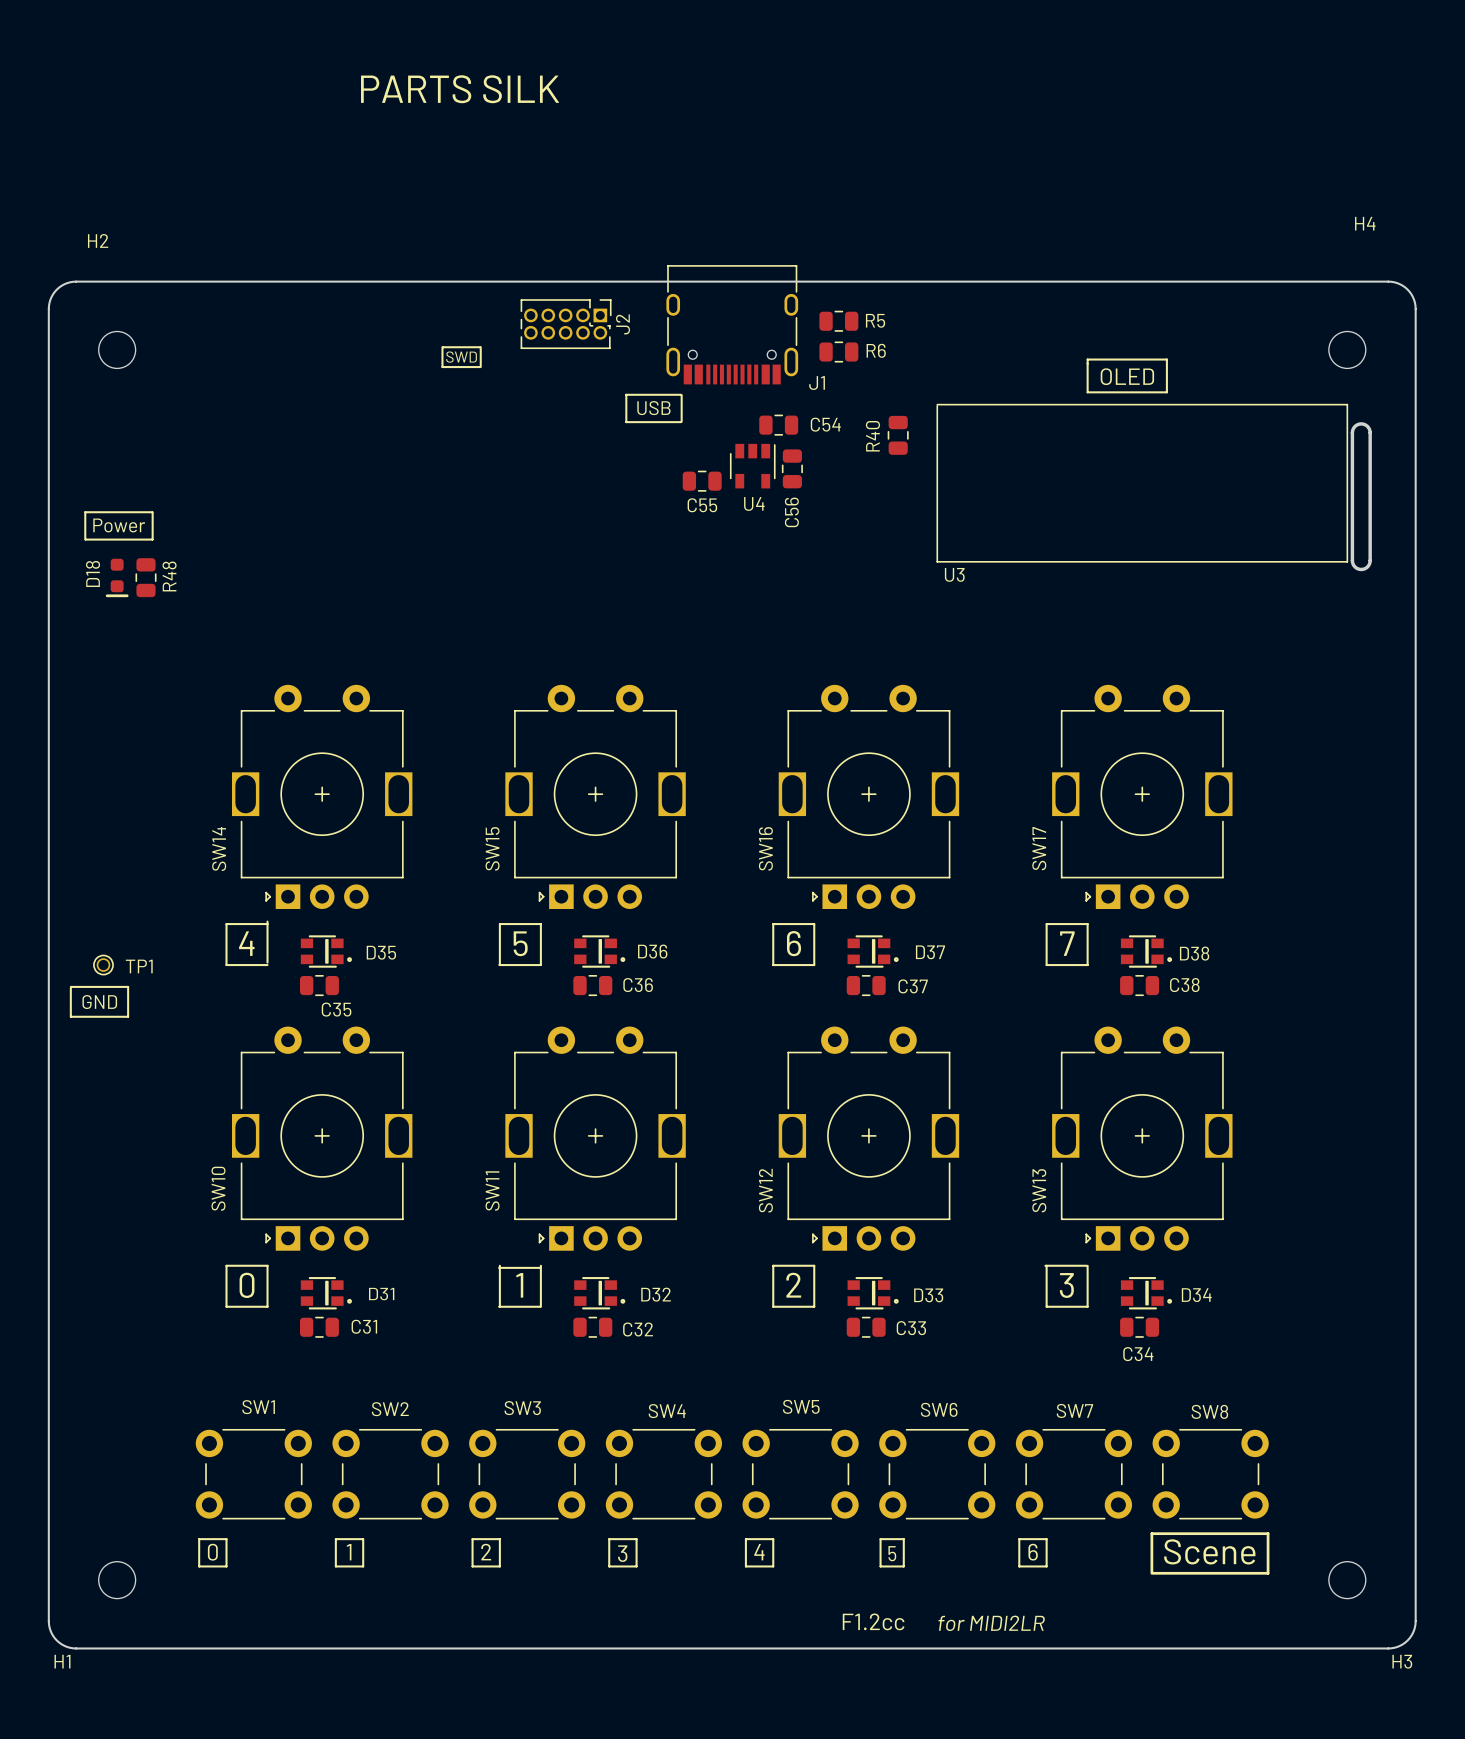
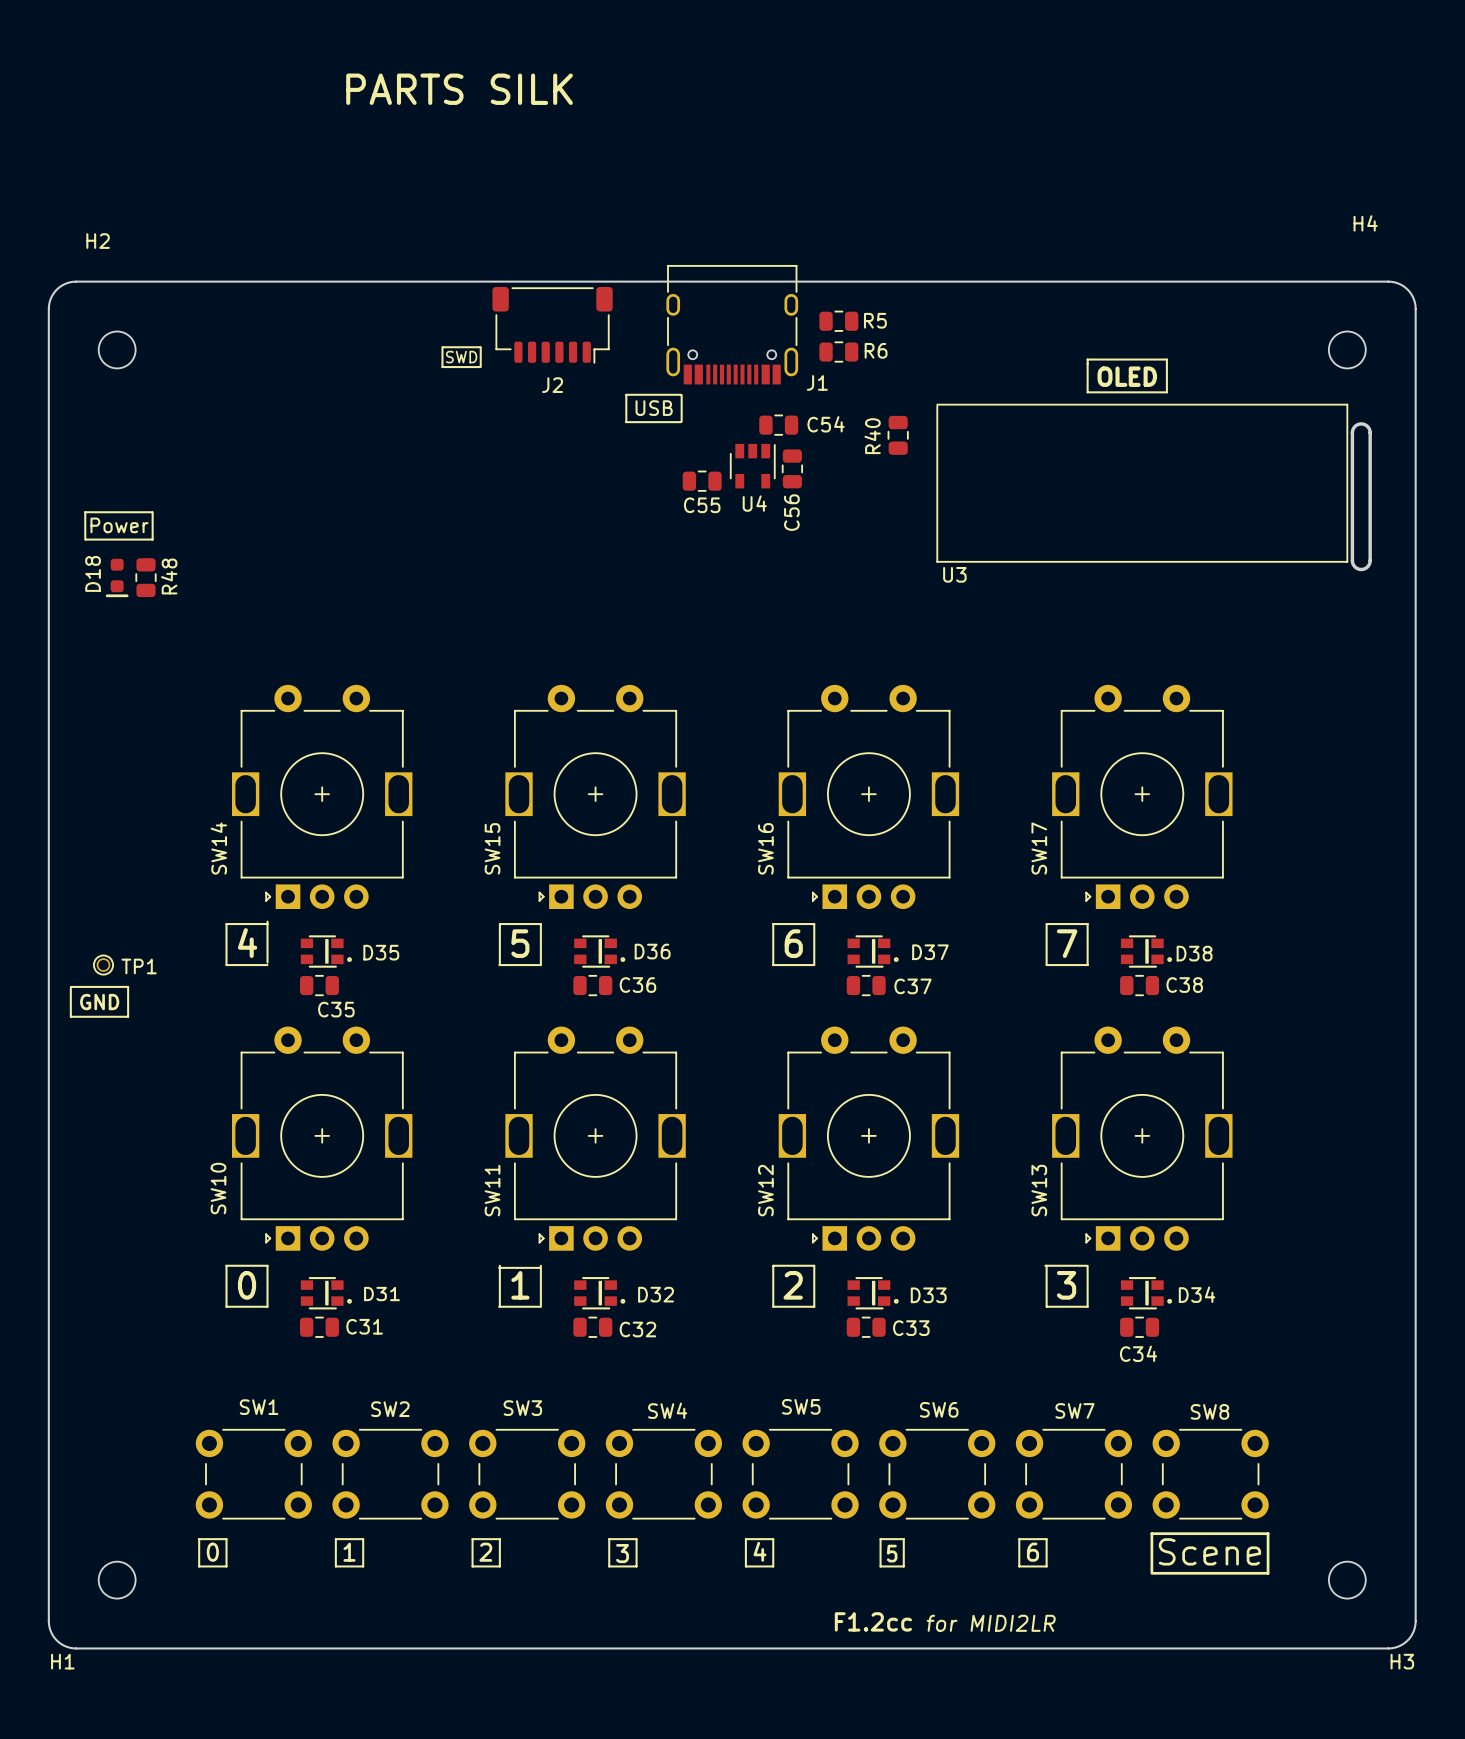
J2 footprint: [520, 299, 612, 350] -> [492, 286, 613, 364]
J2 name position: J2 (623, 324) -> J2 (552, 385)

